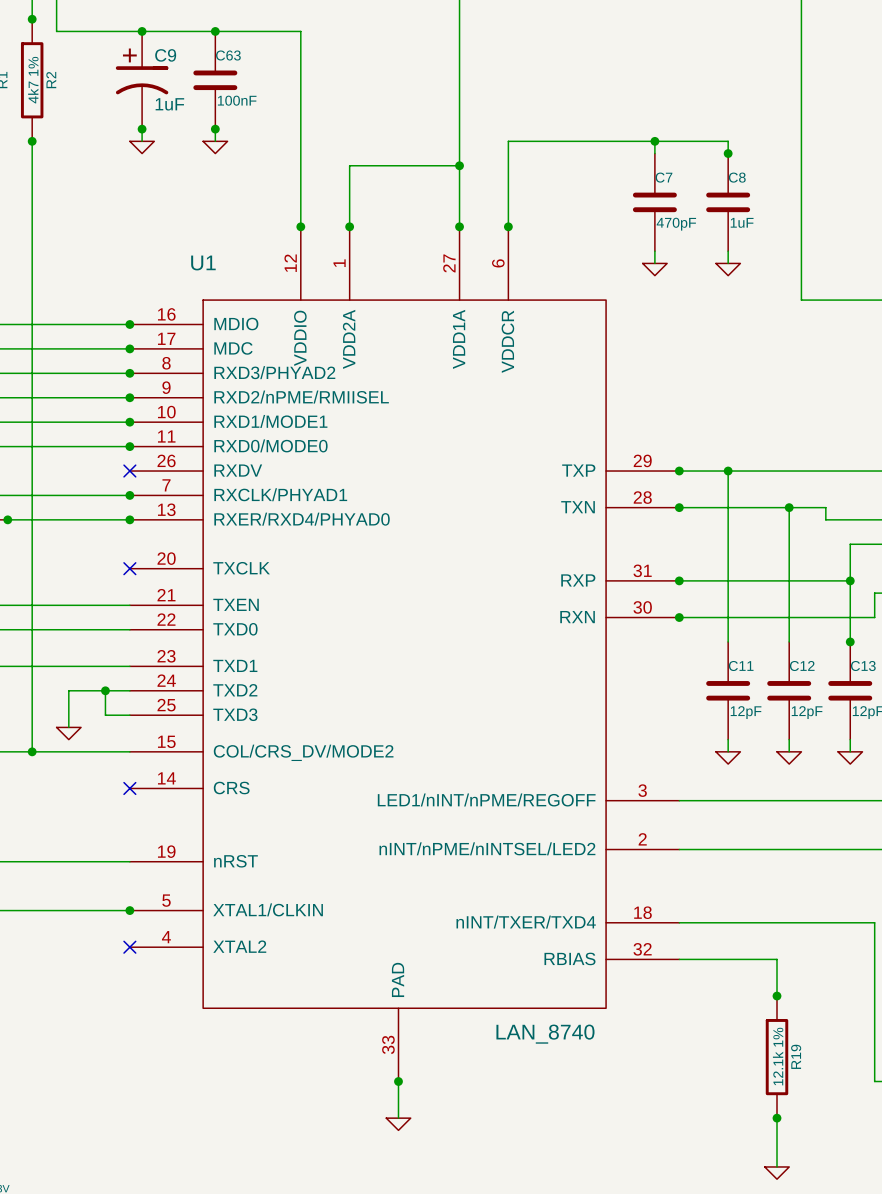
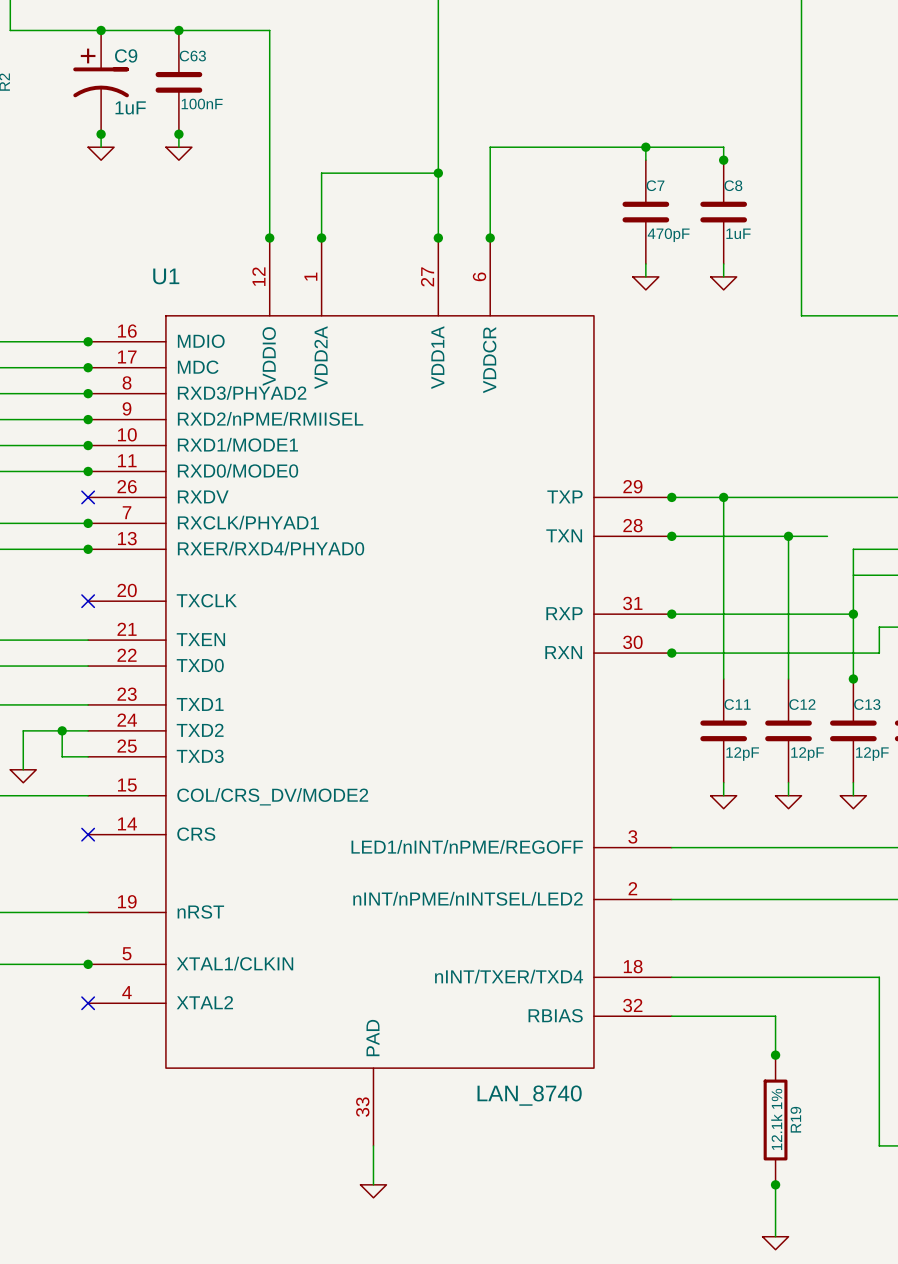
wire: (825, 507) (825, 519) (850, 519) -> (853, 575) (853, 549)
junction: (398, 1081) -> none

